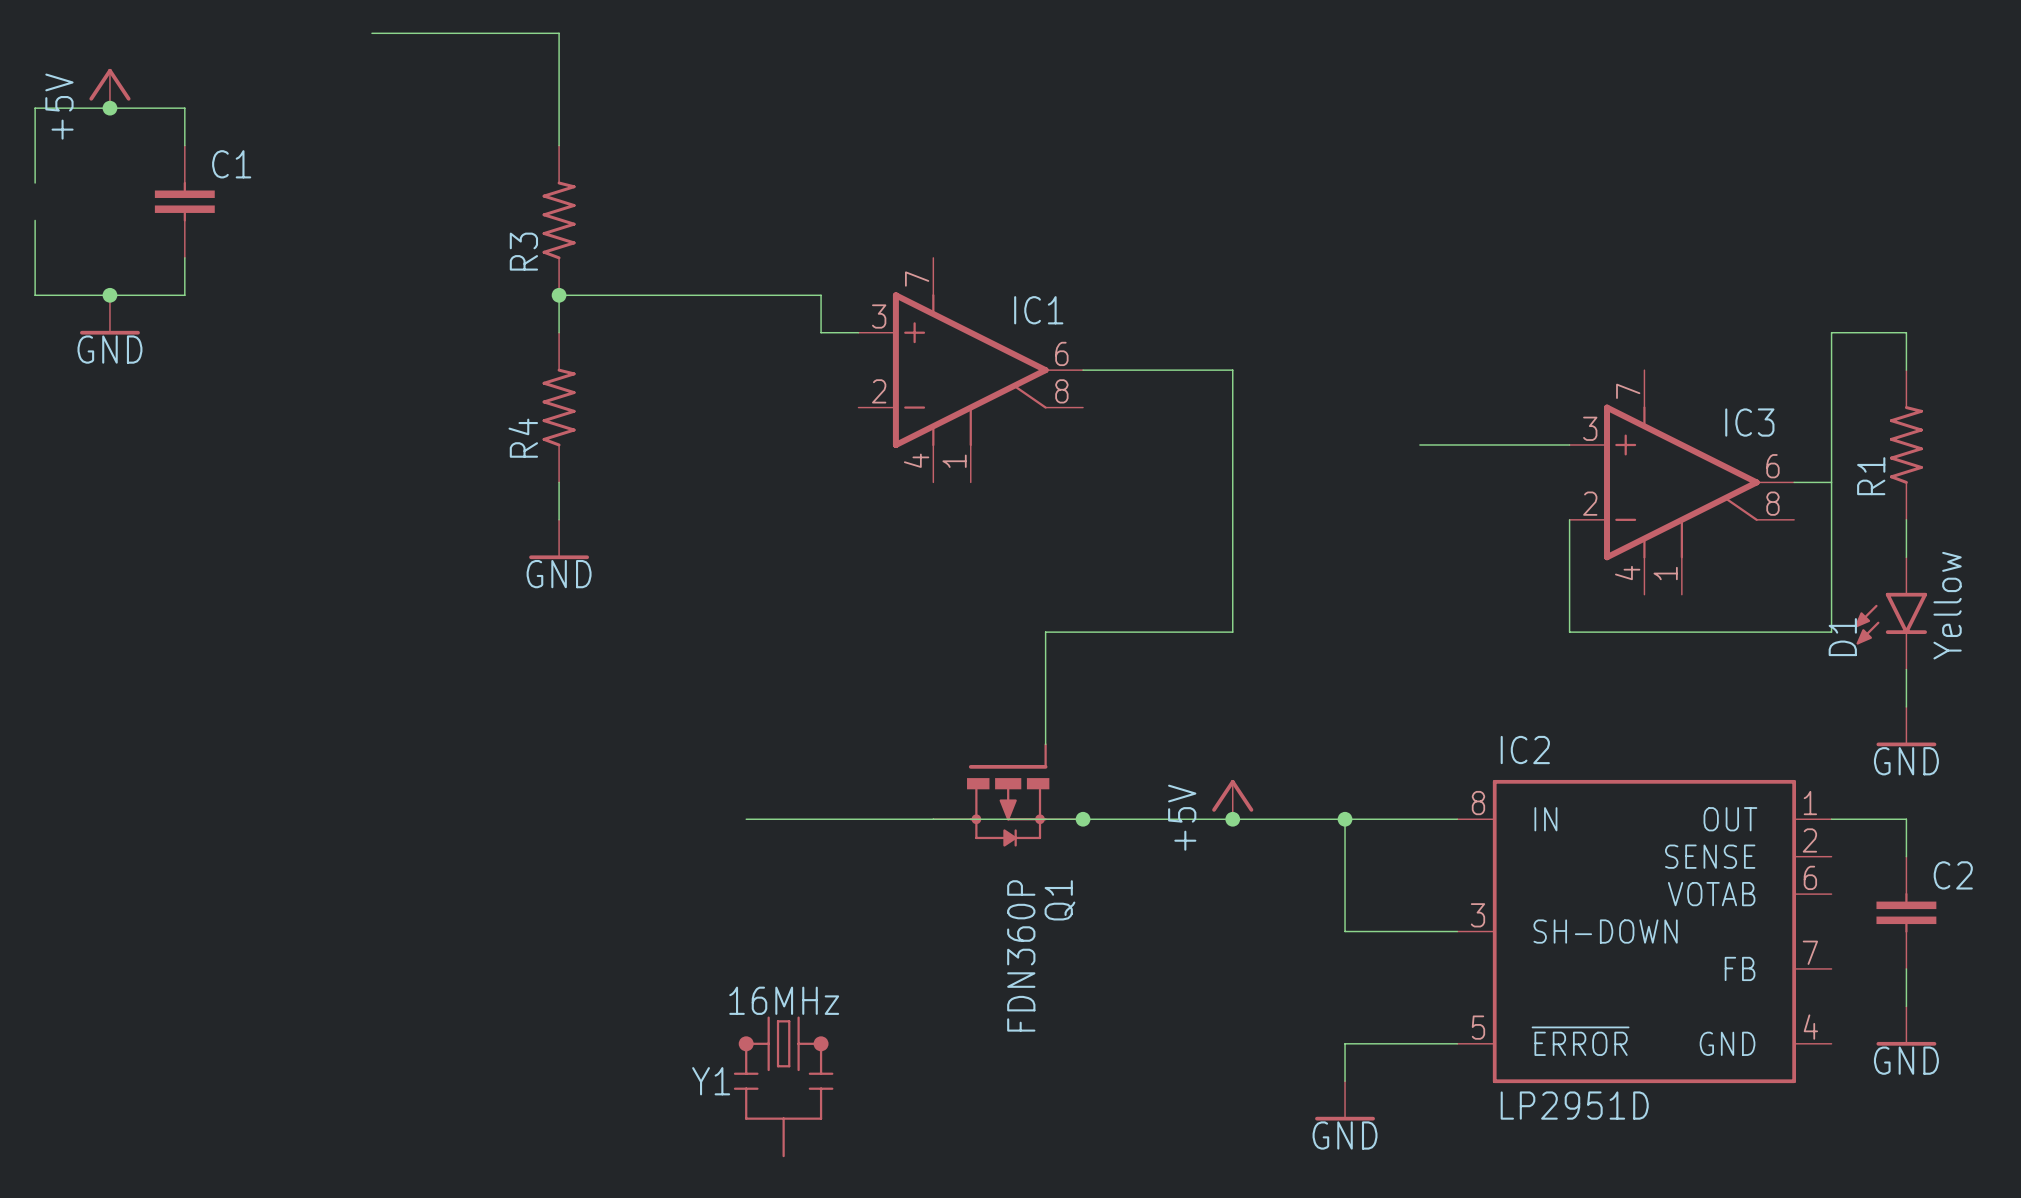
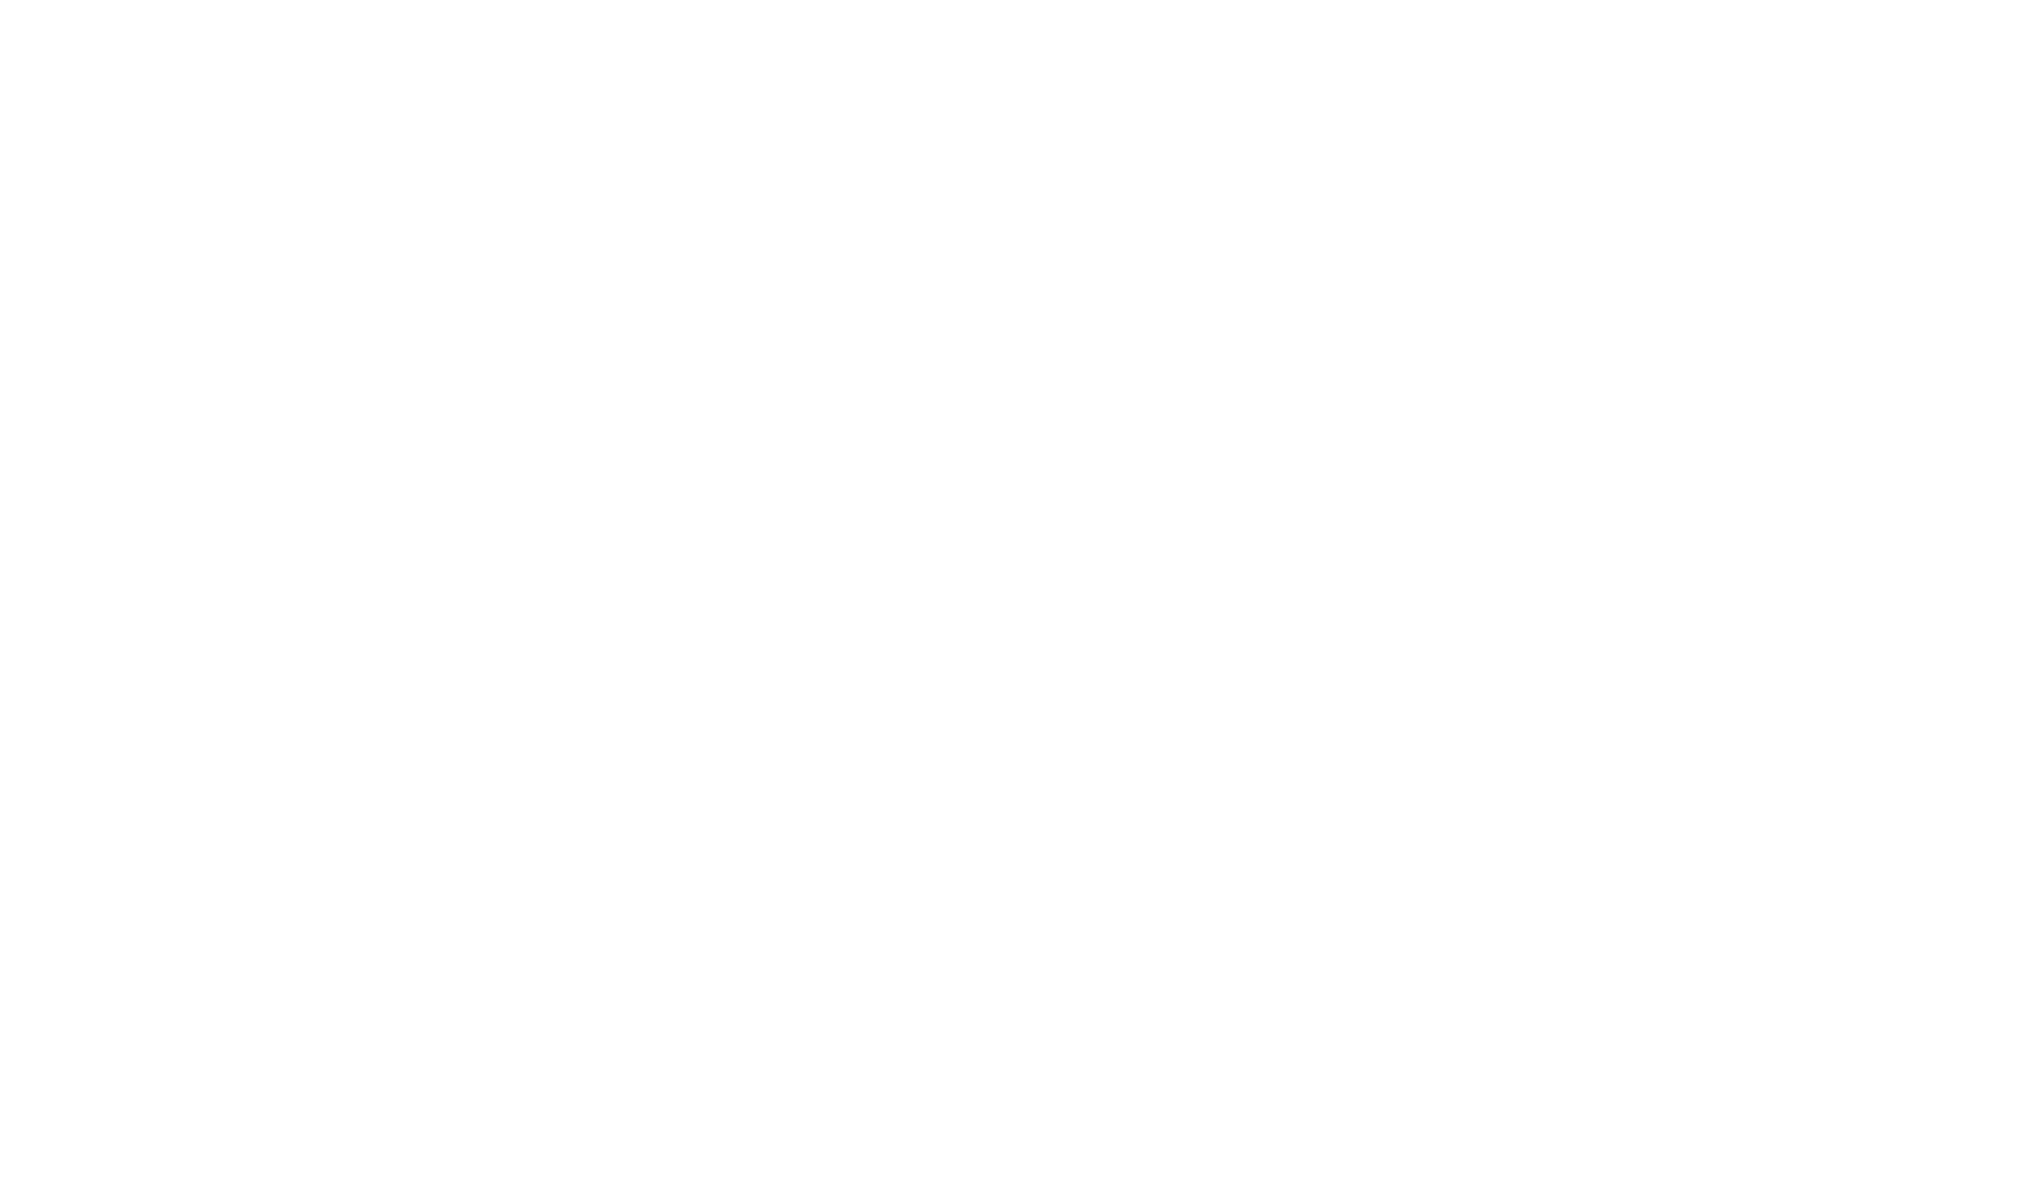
wire: (371, 33) (559, 33) (559, 145) -> none
power symbol: +5V (109, 88) -> none
junction: (109, 108) -> none
wire: (184, 145) (184, 108) (35, 108) (35, 183) -> none
C1: (184, 201) -> none
wire: (35, 220) (35, 295) (184, 295) (184, 257) -> none
R3: (559, 220) -> none
junction: (109, 295) -> none
junction: (559, 295) -> none
power symbol: GND (109, 314) -> none
wire: (559, 332) (559, 295) (821, 295) (821, 332) (858, 332) -> none
IC1: (970, 370) -> none
wire: (1083, 370) (1232, 370) (1232, 632) (1045, 632) (1045, 744) -> none
wire: (1906, 370) (1906, 332) (1831, 332) (1831, 632) (1569, 632) (1569, 519) -> none
R4: (559, 407) -> none
wire: (1419, 444) (1569, 444) -> none
R1: (1906, 444) -> none
wire: (559, 482) (559, 519) -> none
IC3: (1681, 482) -> none
wire: (1794, 482) (1831, 482) -> none
wire: (1906, 519) (1906, 557) -> none
power symbol: GND (559, 539) -> none
D1: Yellow (1890, 613) -> none
wire: (1906, 669) (1906, 706) -> none
power symbol: GND (1906, 726) -> none
Q1: FDN360P (1008, 794) -> none
power symbol: +5V (1232, 799) -> none
wire: (746, 819) (1457, 819) -> none
junction: (1083, 819) -> none
junction: (1232, 819) -> none
wire: (1345, 819) (1345, 931) (1457, 931) -> none
junction: (1345, 819) -> none
wire: (1831, 819) (1906, 819) (1906, 856) -> none
C2: (1906, 912) -> none
IC2: LP2951D (1644, 931) -> none
wire: (1906, 968) (1906, 1006) -> none
power symbol: GND (1906, 1026) -> none
wire: (1457, 1043) (1345, 1043) (1345, 1081) -> none
Y1: 16MHz (783, 1086) -> none
power symbol: GND (1345, 1100) -> none

